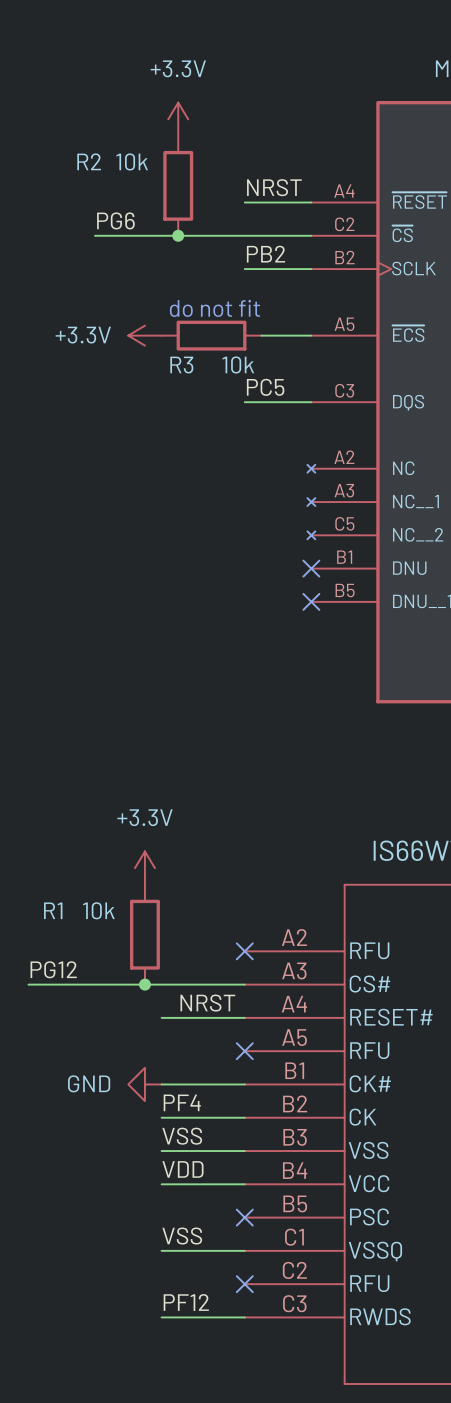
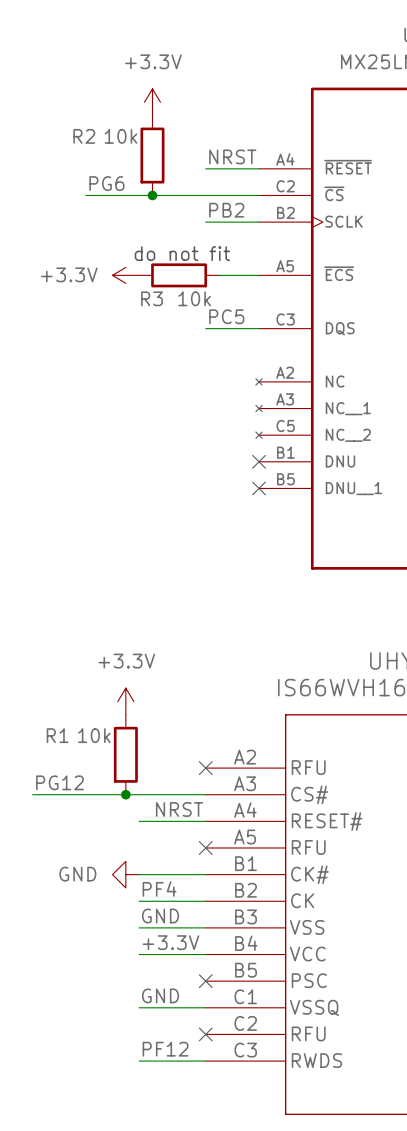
label: VSS (182, 1136) -> GND (160, 916)
label: VDD (182, 1169) -> +3.3V (170, 942)
label: VSS (182, 1236) -> GND (160, 995)

